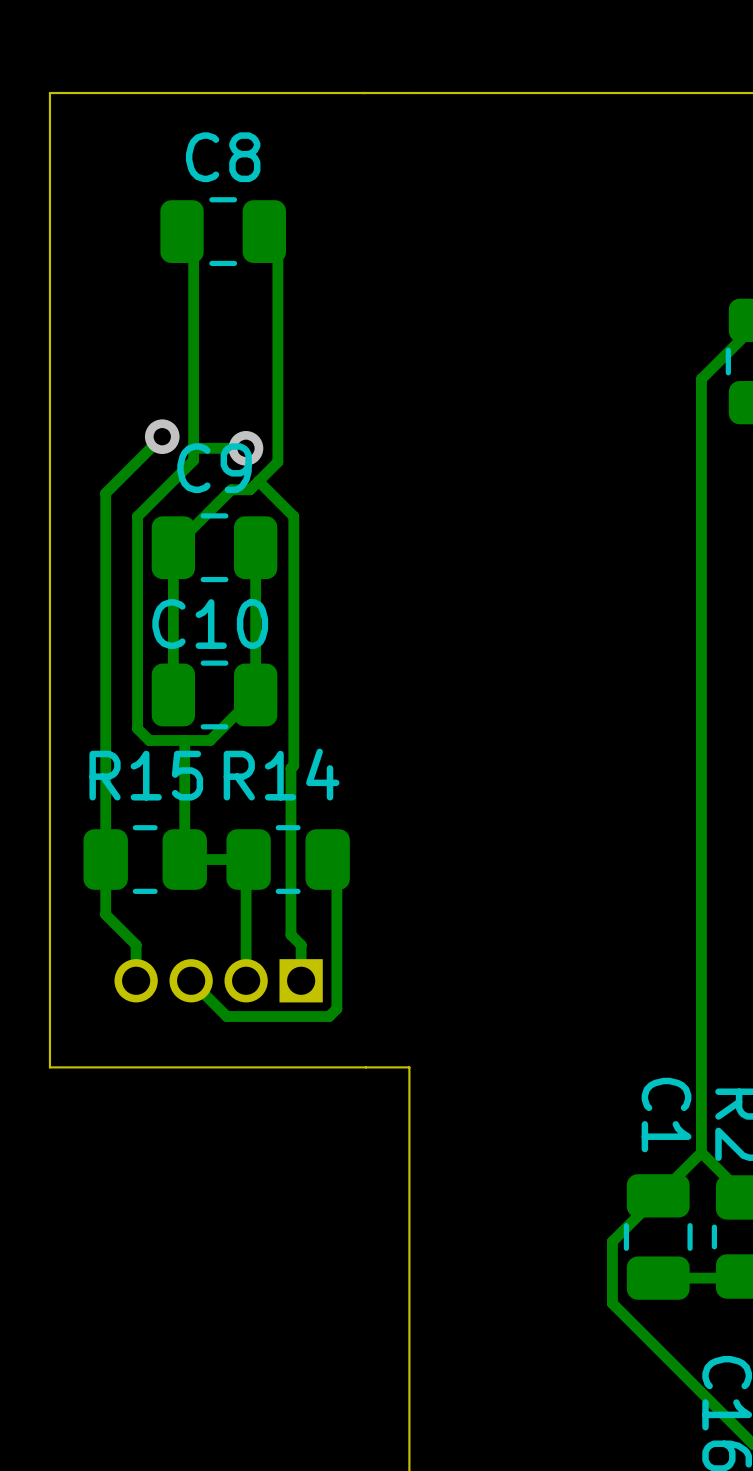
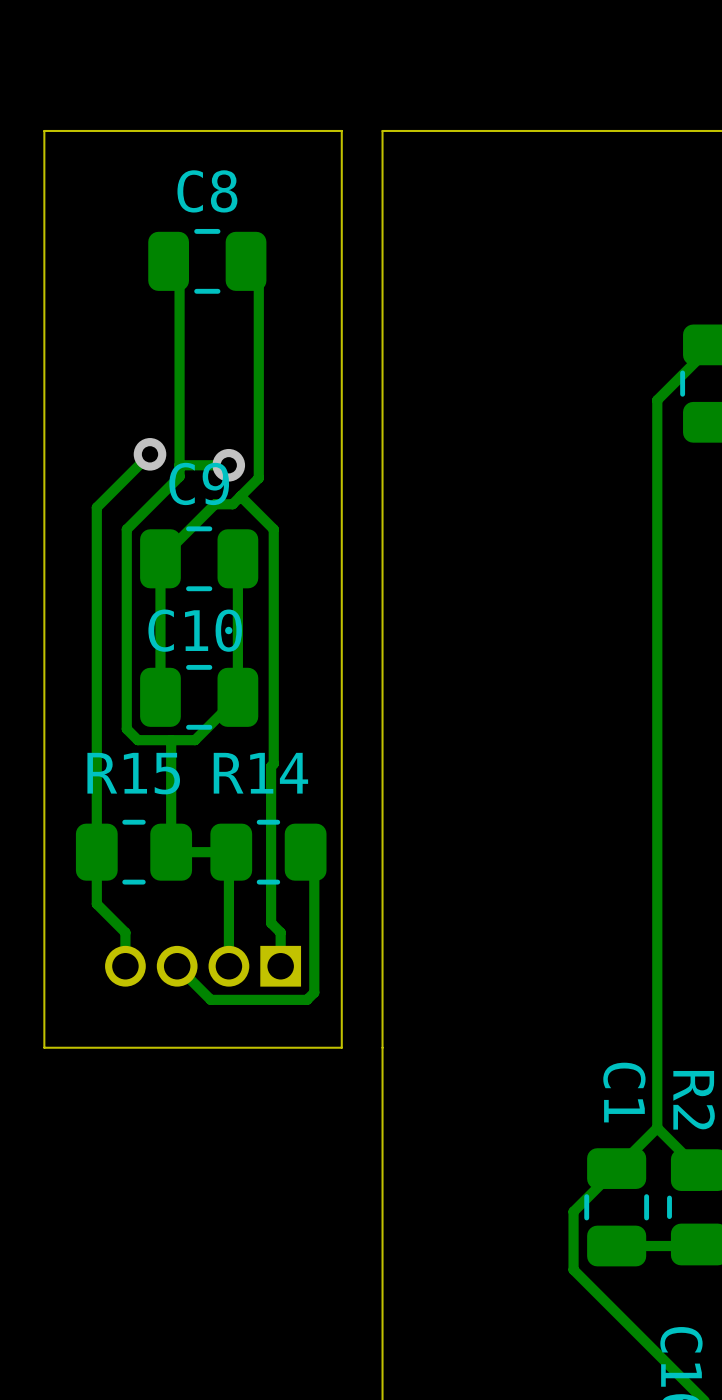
board edge: (409, 93) (366, 93) -> (382, 130) (382, 1047)
board edge: (409, 1067) (366, 1067) -> (341, 130) (341, 1047)

